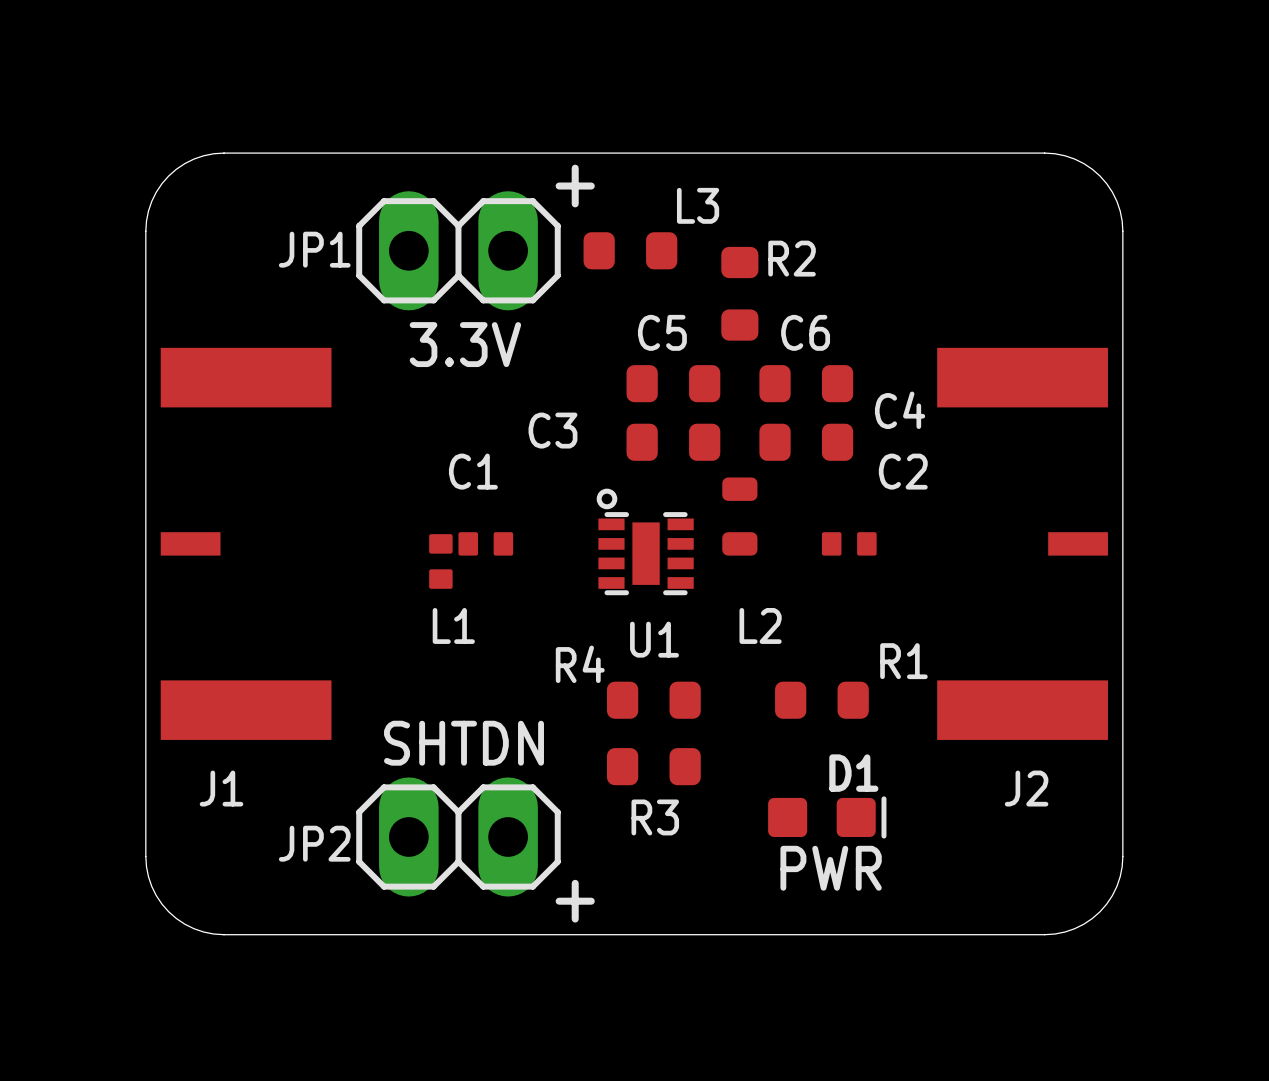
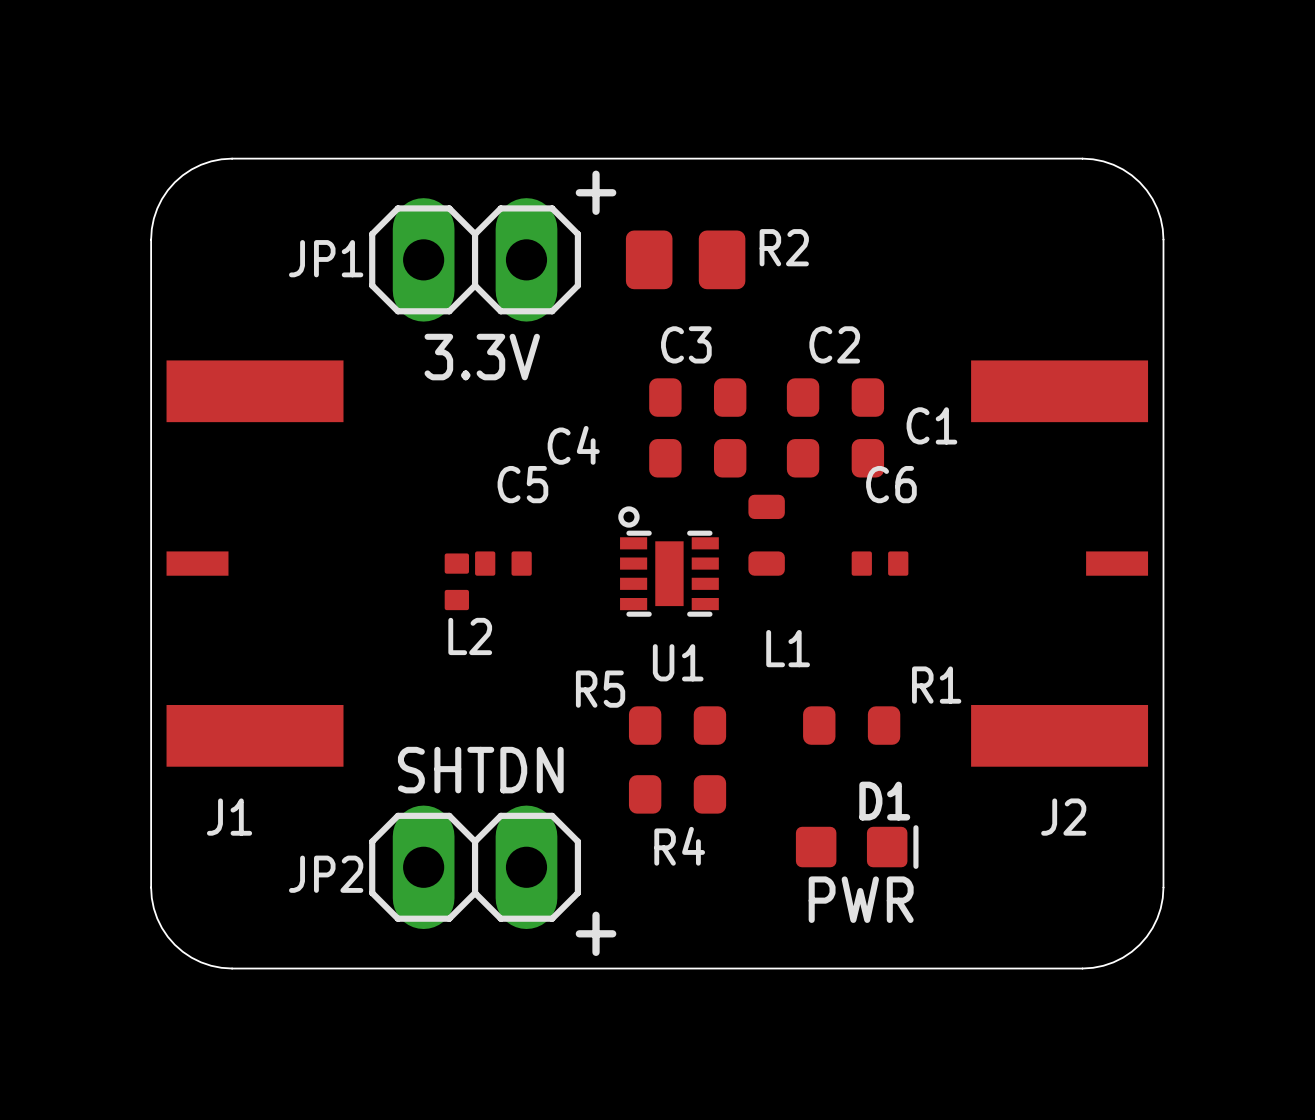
R2 footprint: [721, 246, 759, 341] -> [625, 230, 746, 290]
L3: (630, 250) -> none
C5 name: C5 (662, 332) -> C3 (686, 344)
C6 name: C6 (805, 332) -> C2 (834, 344)
C4 name: C4 (900, 410) -> C1 (931, 425)
C3 name: C3 (552, 430) -> C4 (573, 445)
C1 name: C1 (473, 471) -> C5 (522, 484)
C2 name: C2 (903, 471) -> C6 (891, 484)
L1 name: L1 (453, 625) -> L2 (470, 636)
L2 name: L2 (760, 625) -> L1 (788, 648)
R4 name: R4 (580, 664) -> R5 (600, 689)
R3 name: R3 (655, 817) -> R4 (679, 846)

